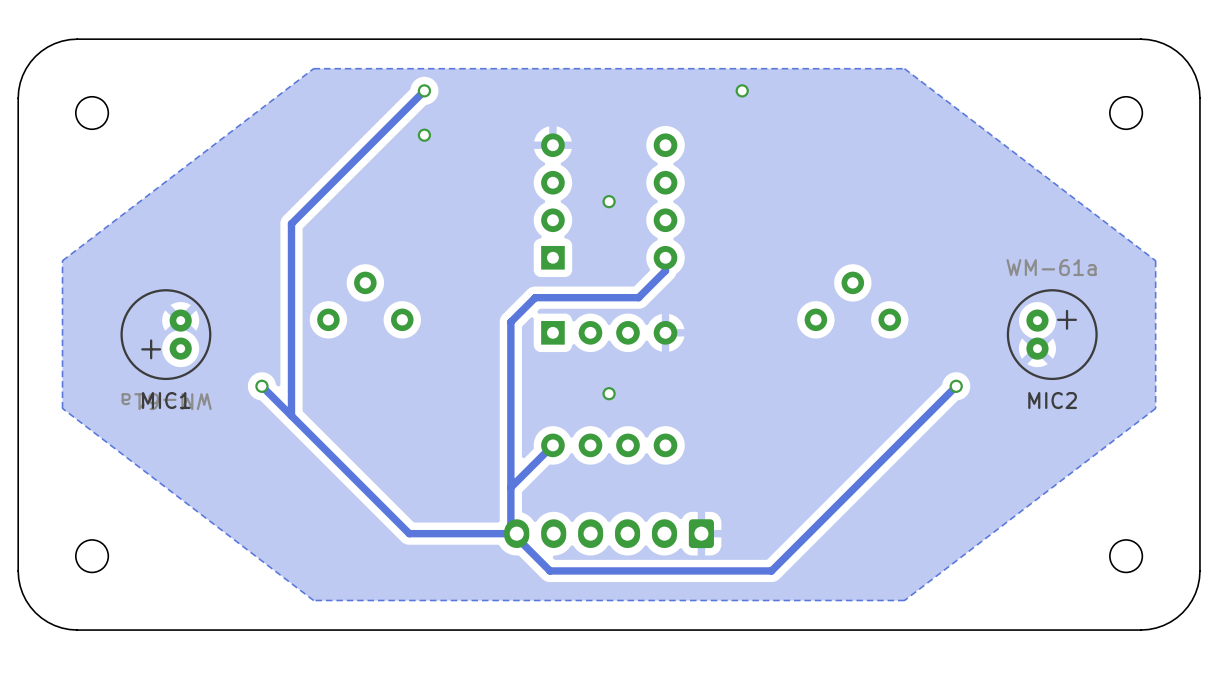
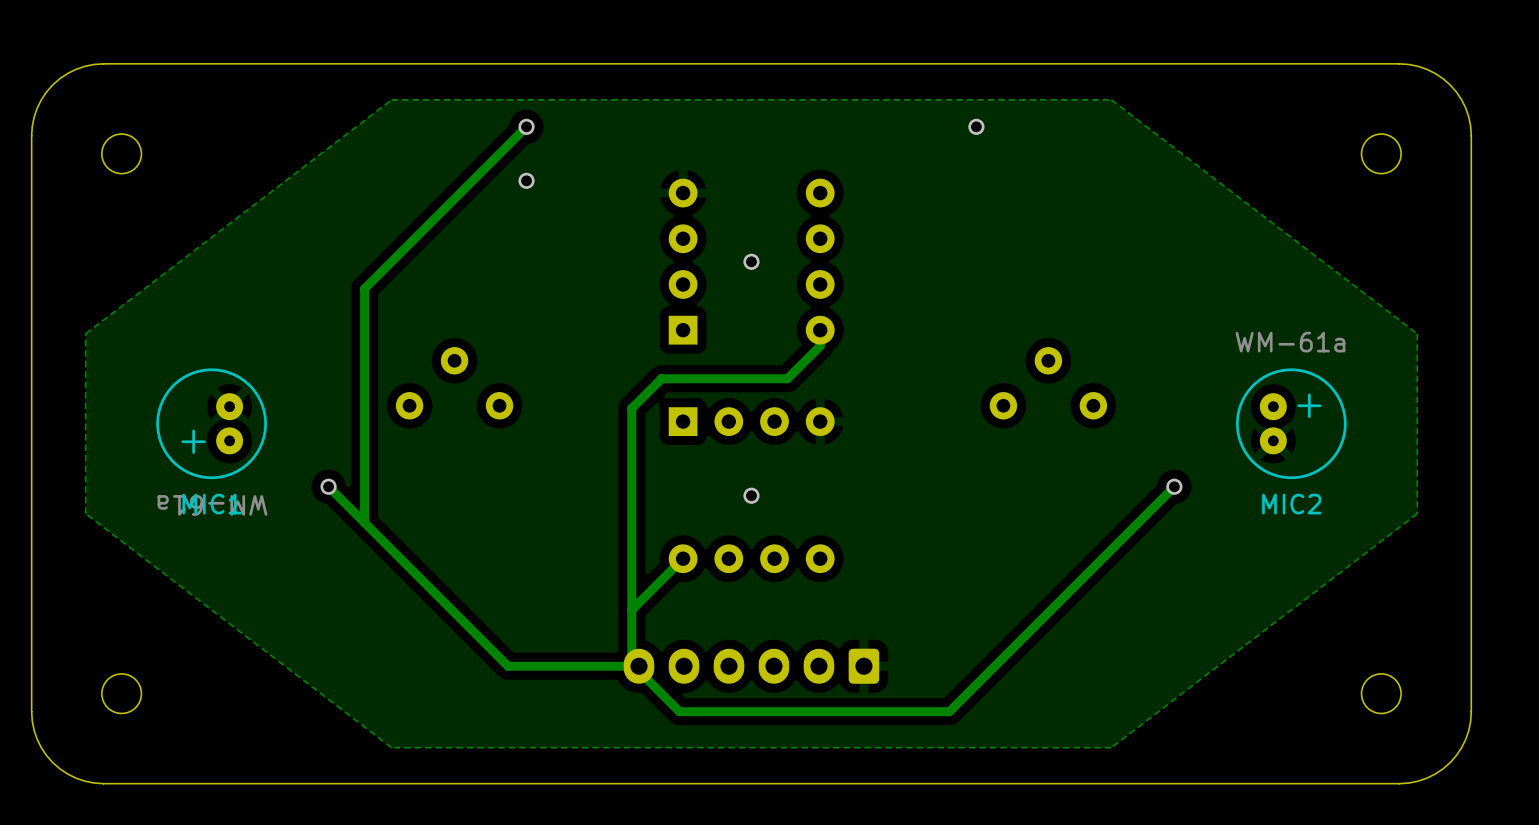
via position: (742, 90) -> (976, 126)

